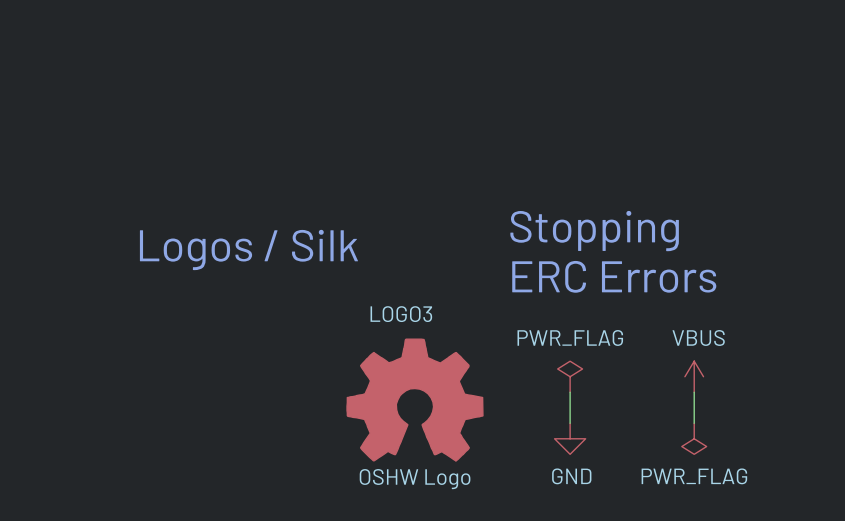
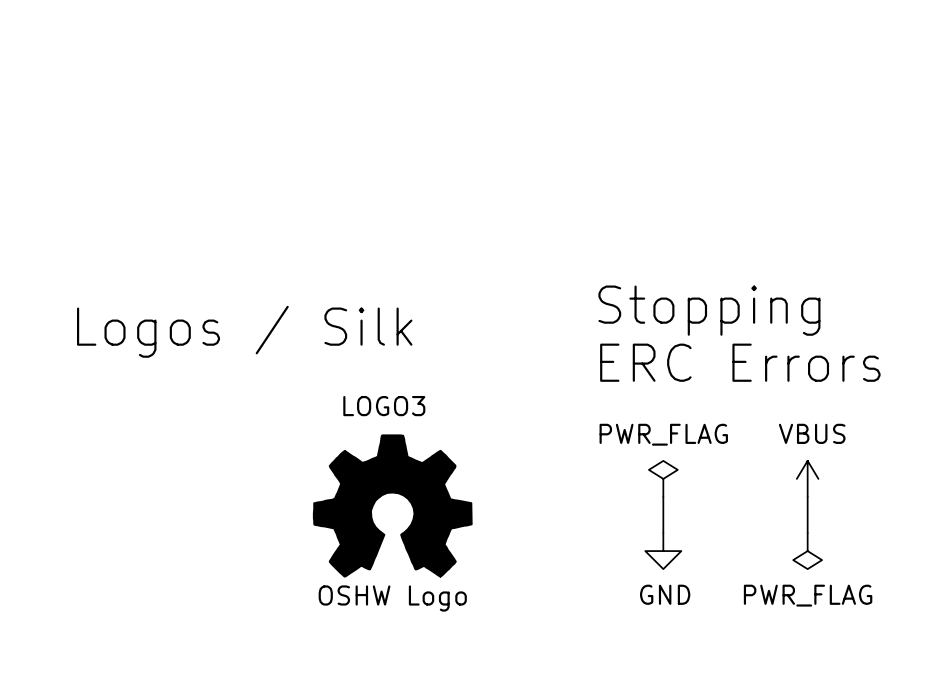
text position: Logos / Silk (248, 249) -> Logos / Silk (244, 331)
LOGO3 position: (414, 400) -> (392, 505)

